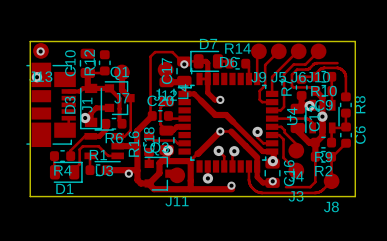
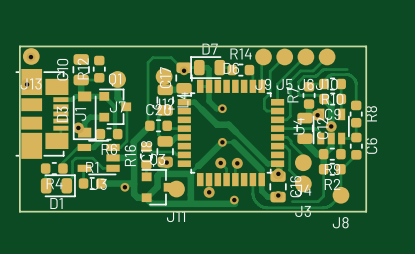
track: (257, 131) (257, 137) (263, 143) (272, 143) -> none
via: (257, 131) -> none

